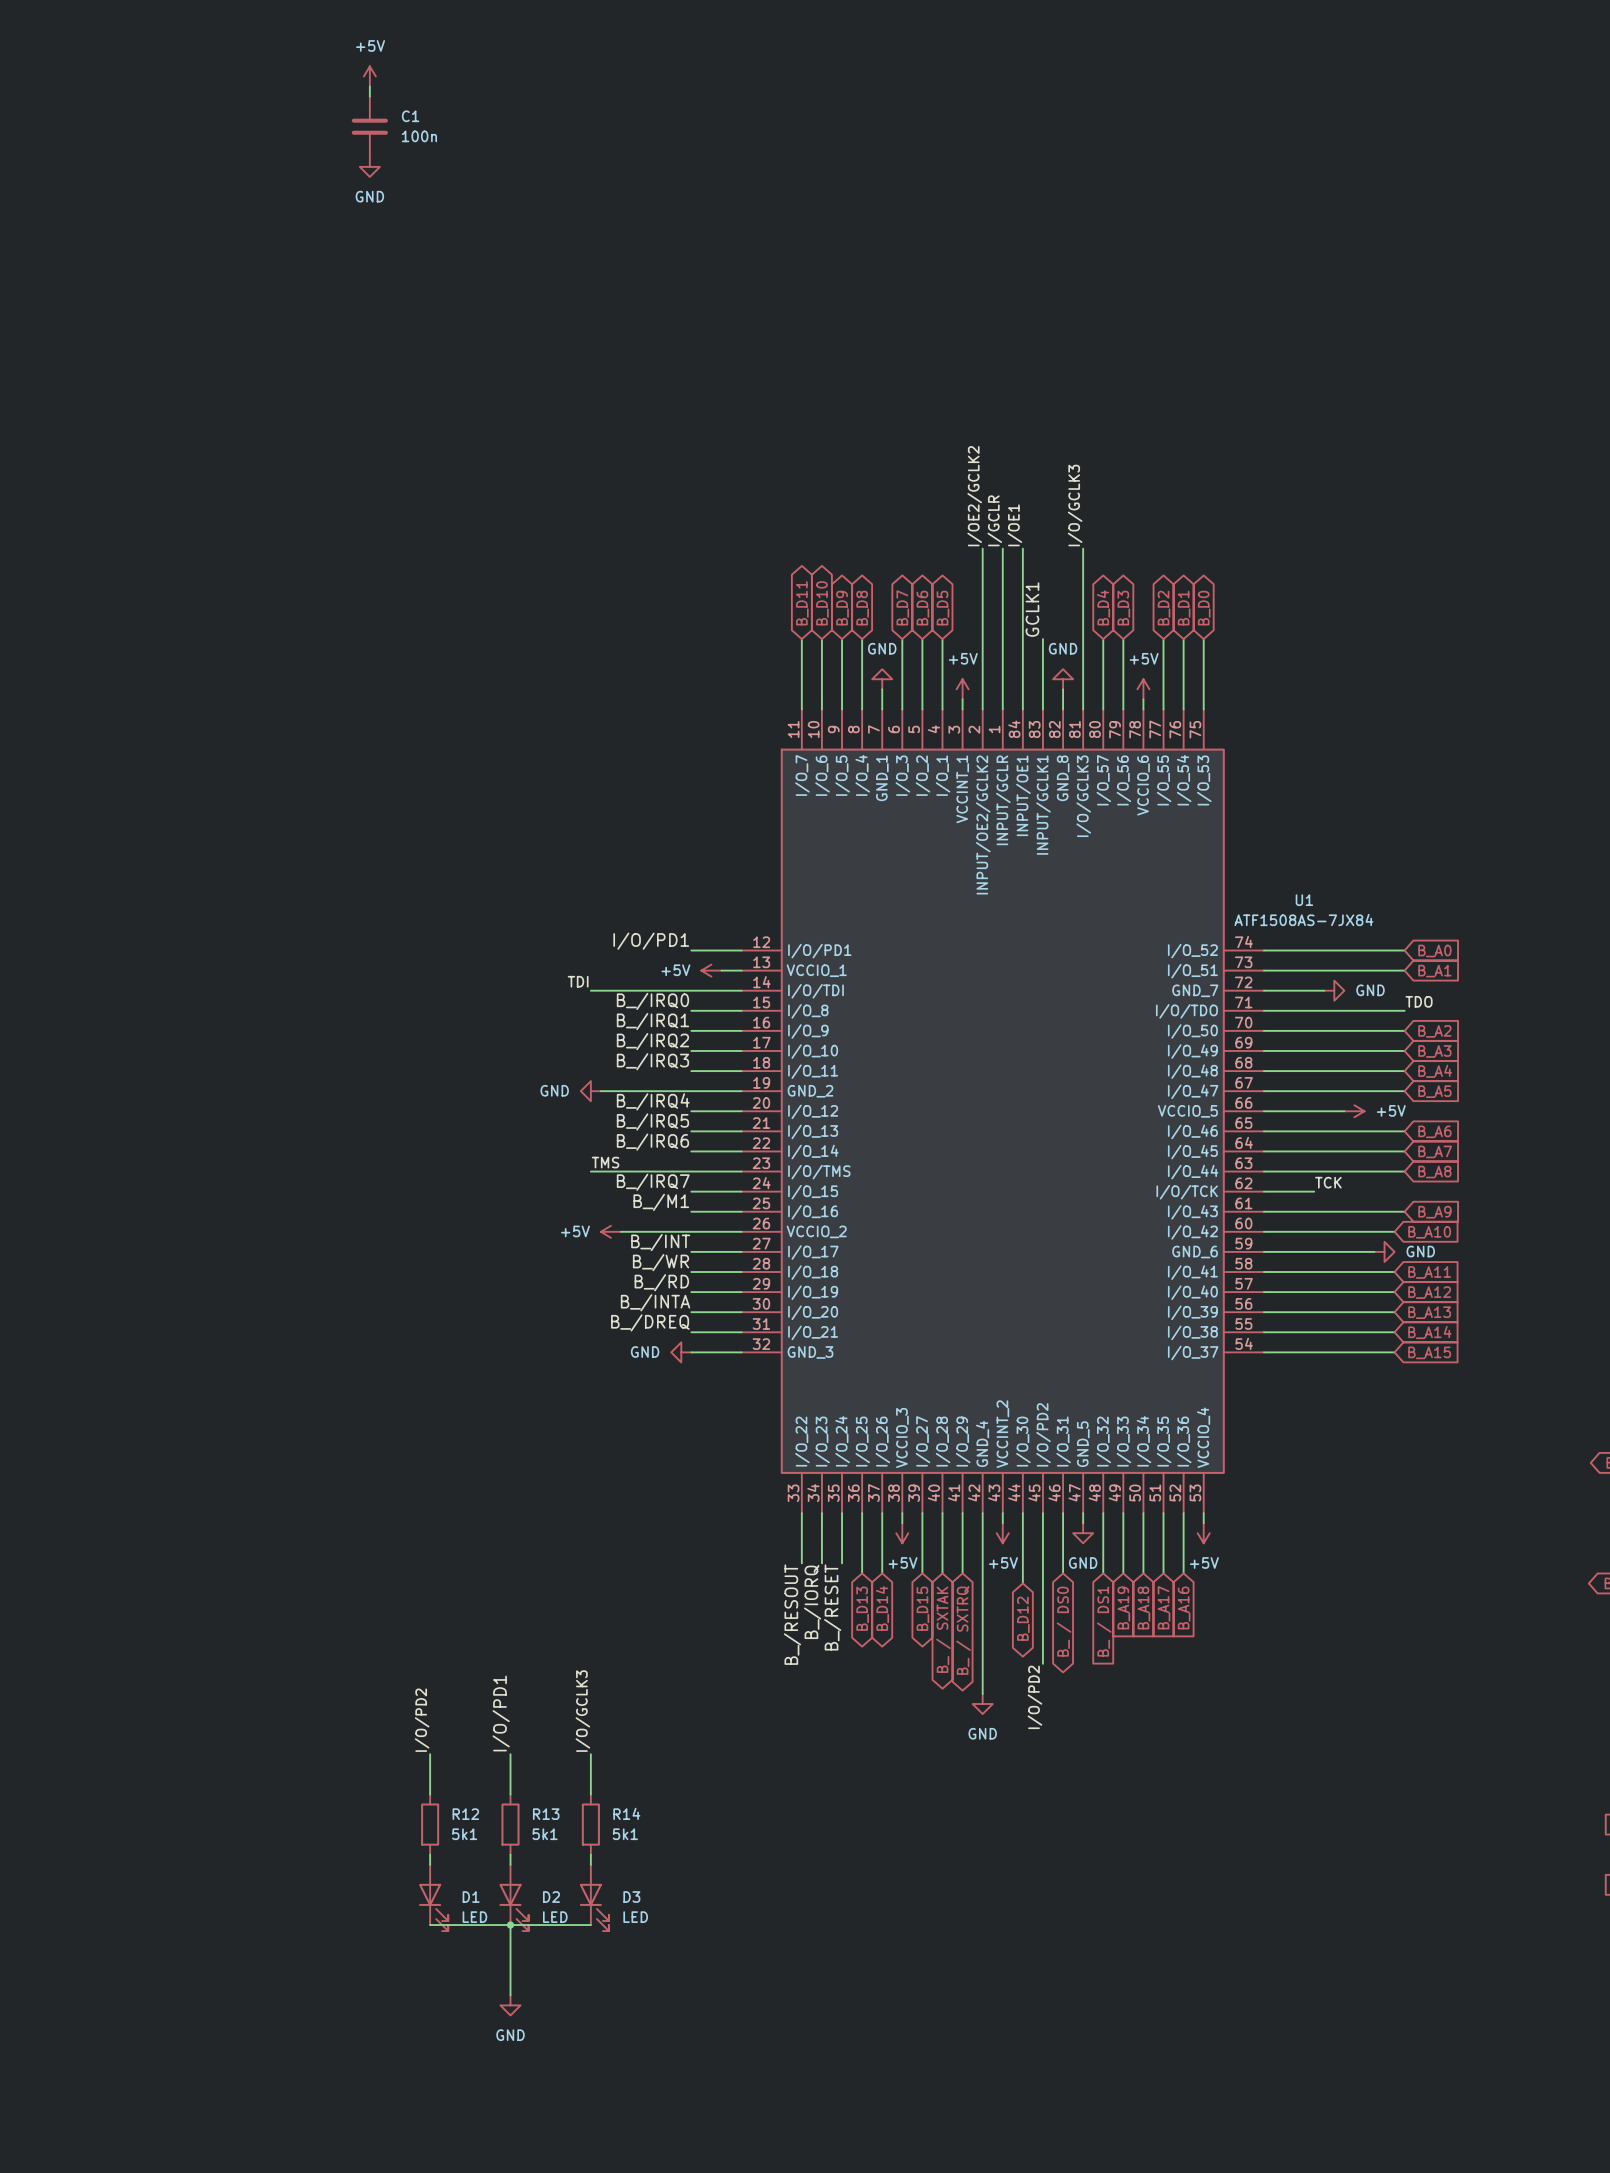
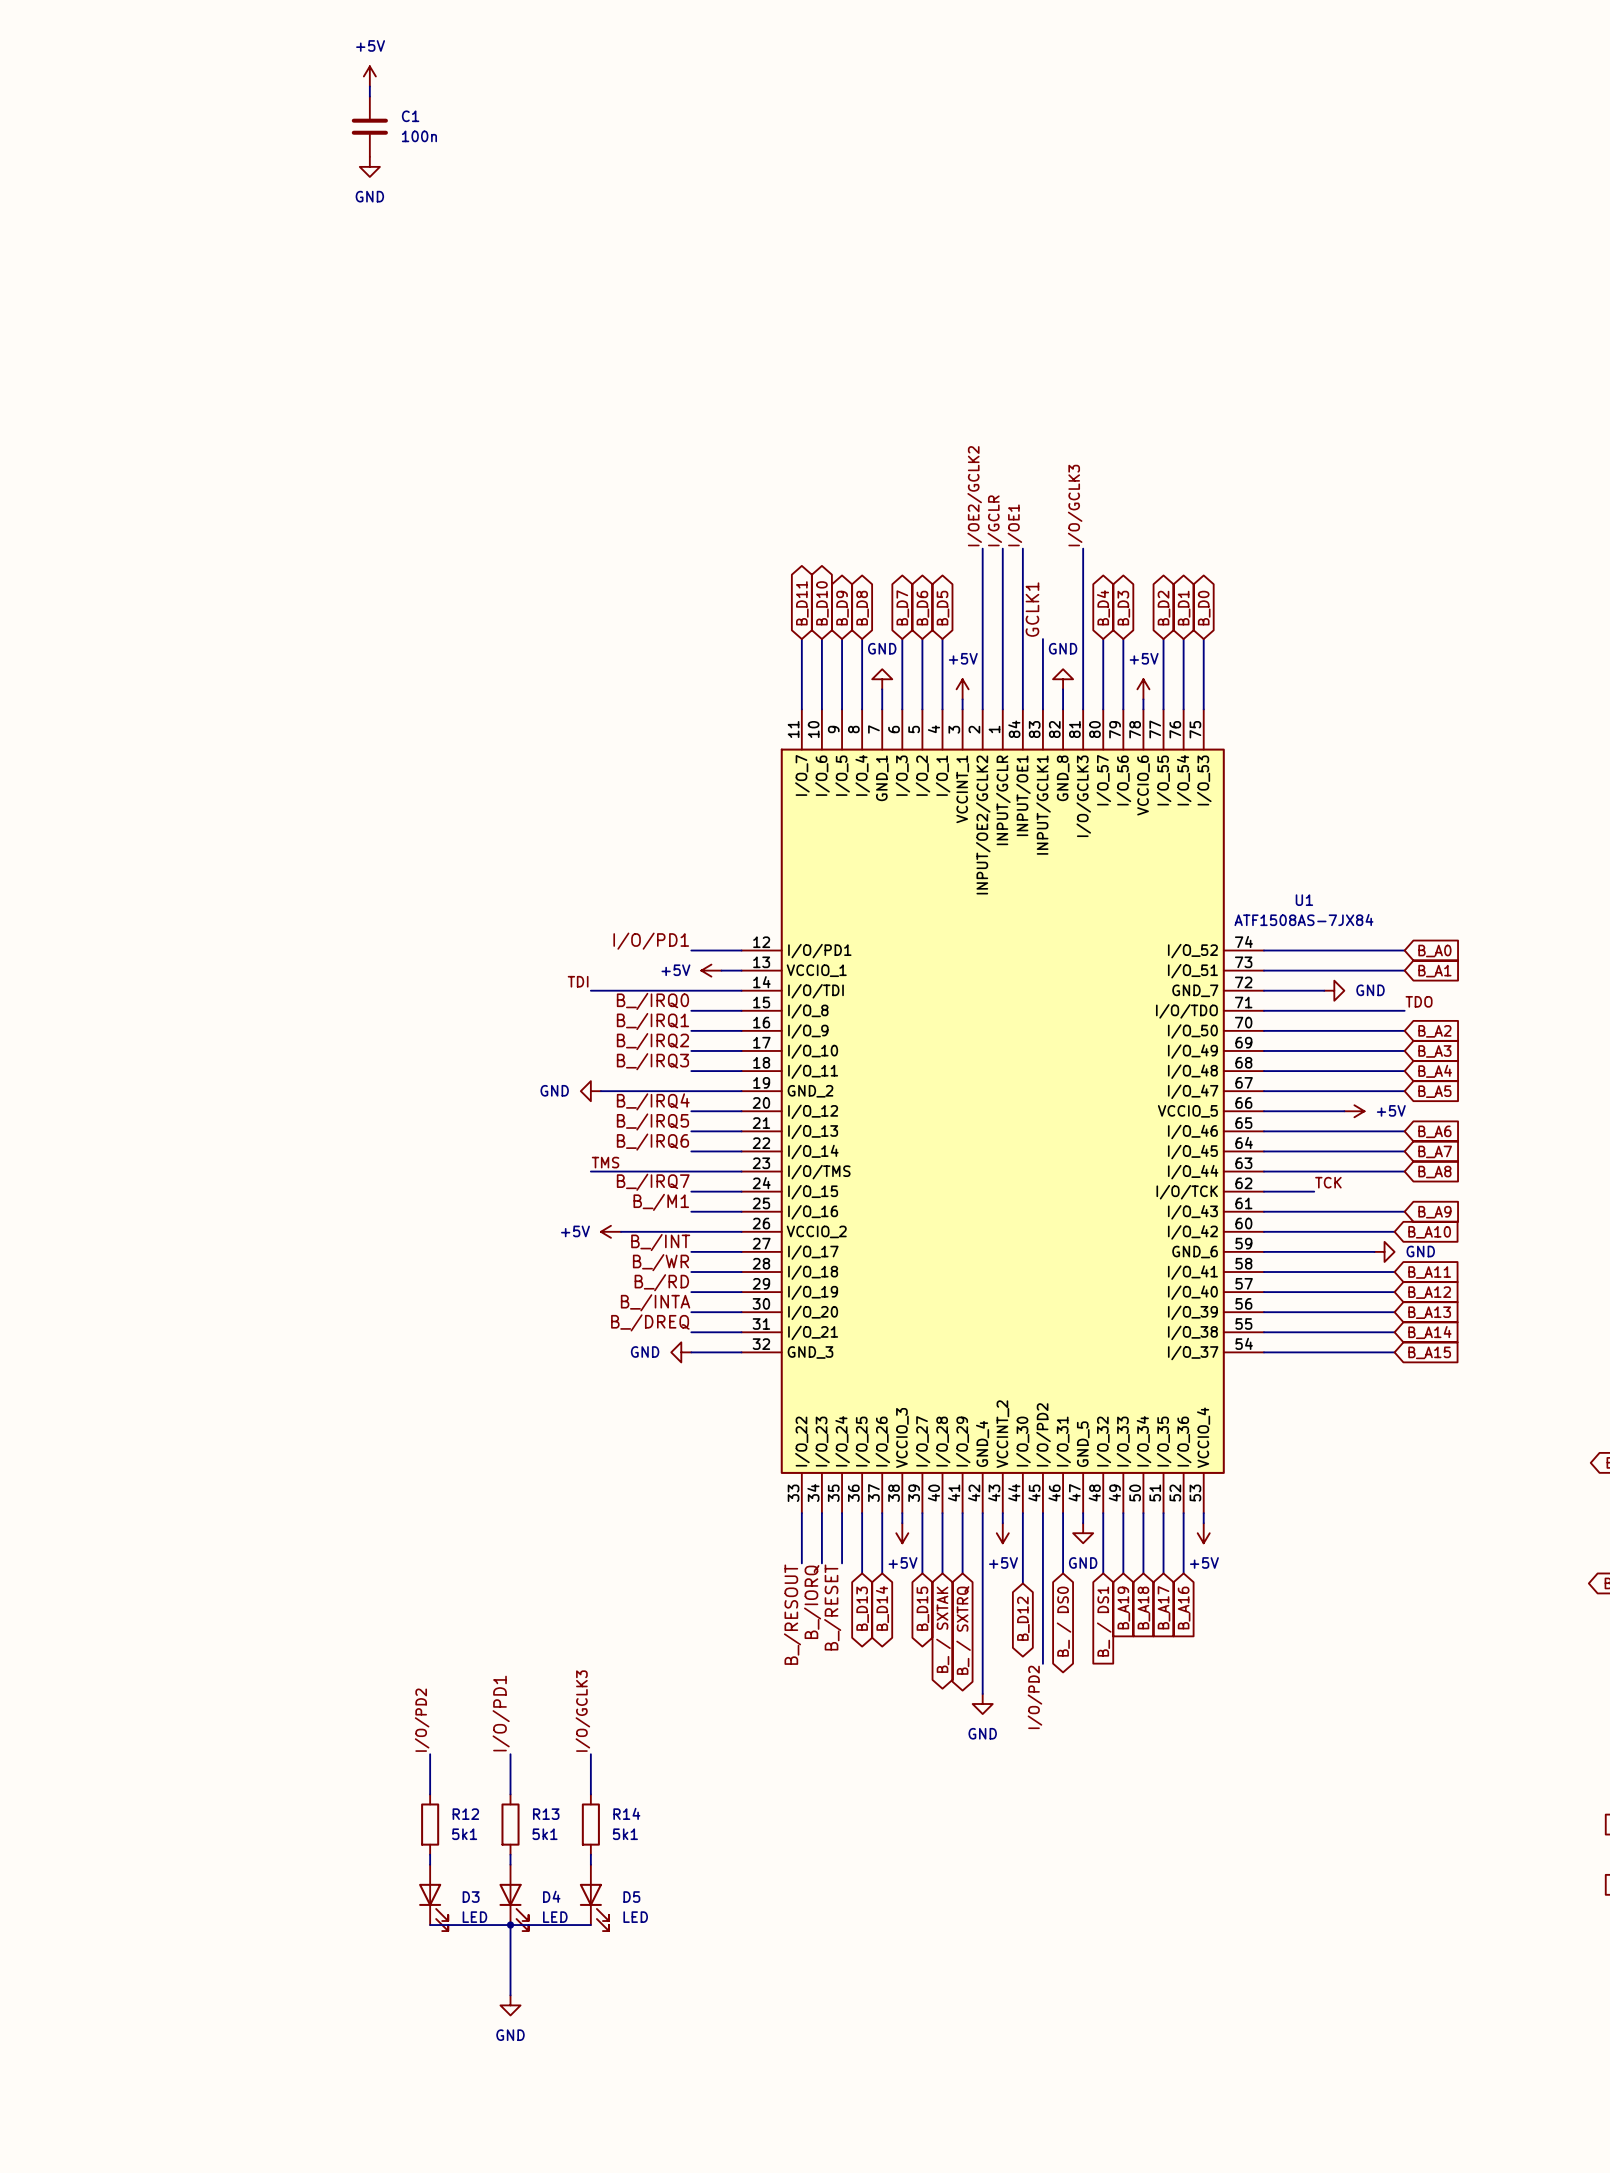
D1 name: D1 (471, 1897) -> D3 (471, 1897)
D2 name: D2 (551, 1897) -> D4 (551, 1896)
D3 name: D3 (631, 1897) -> D5 (631, 1897)

